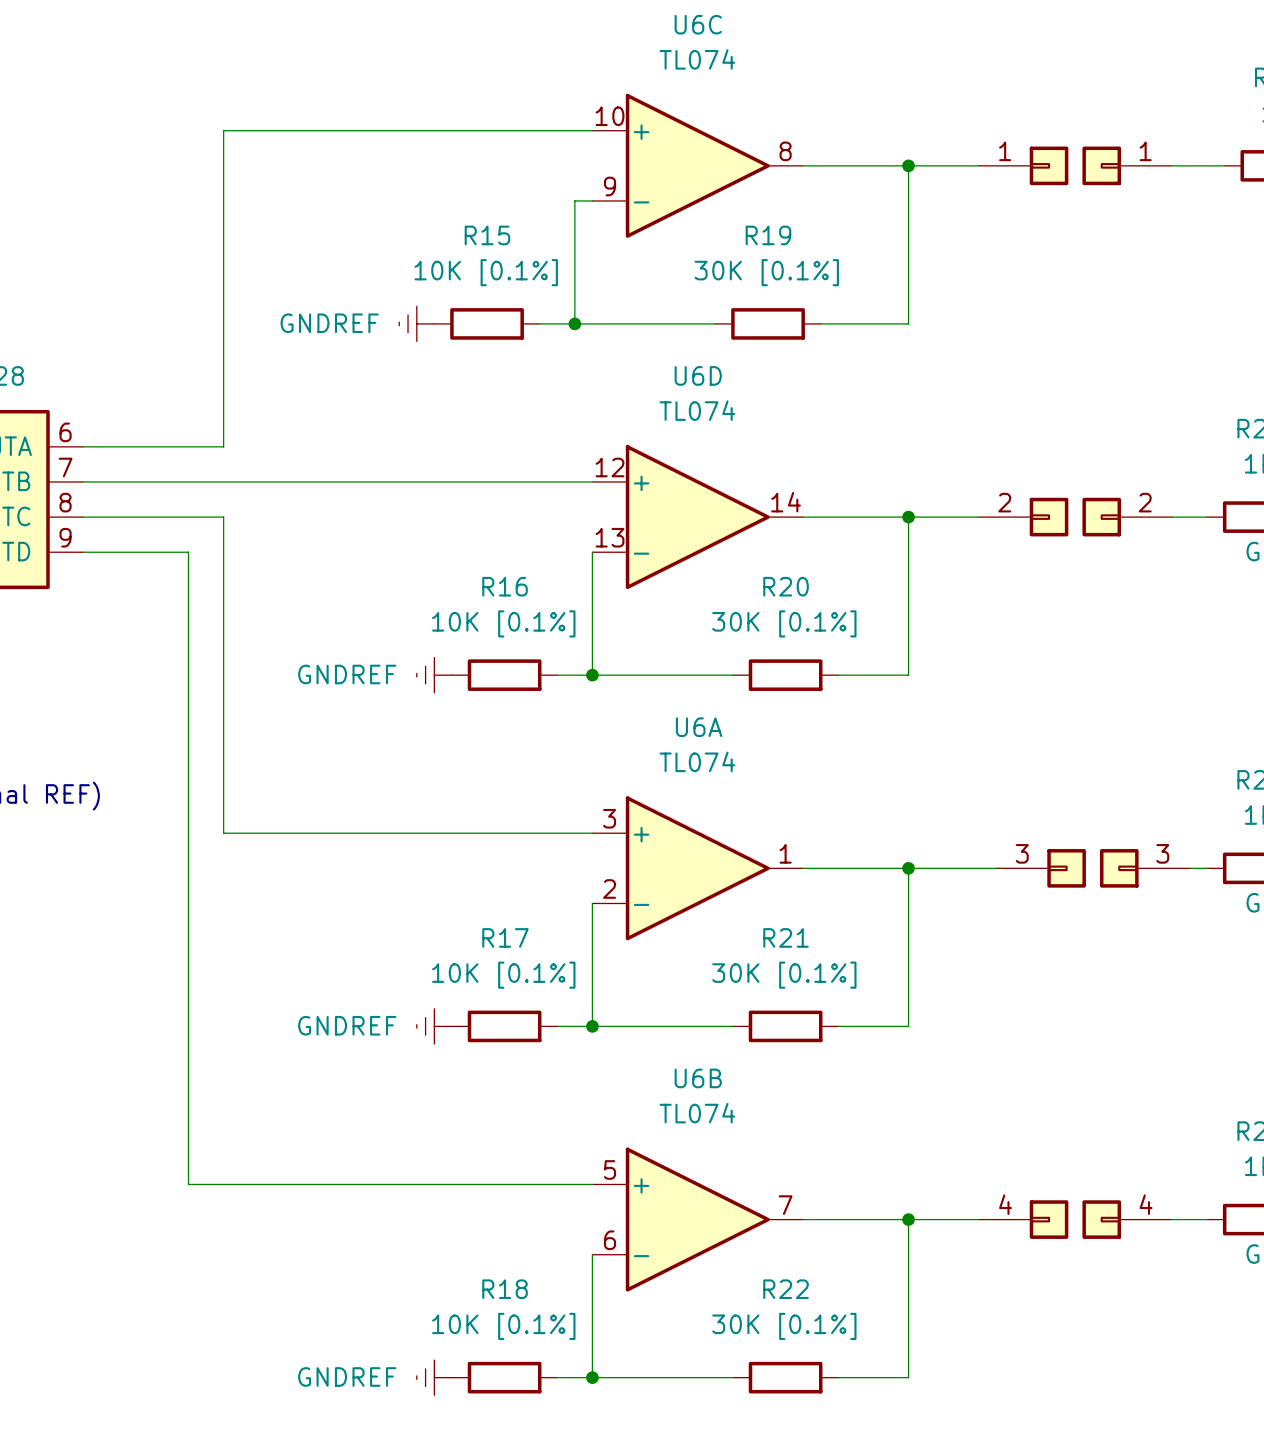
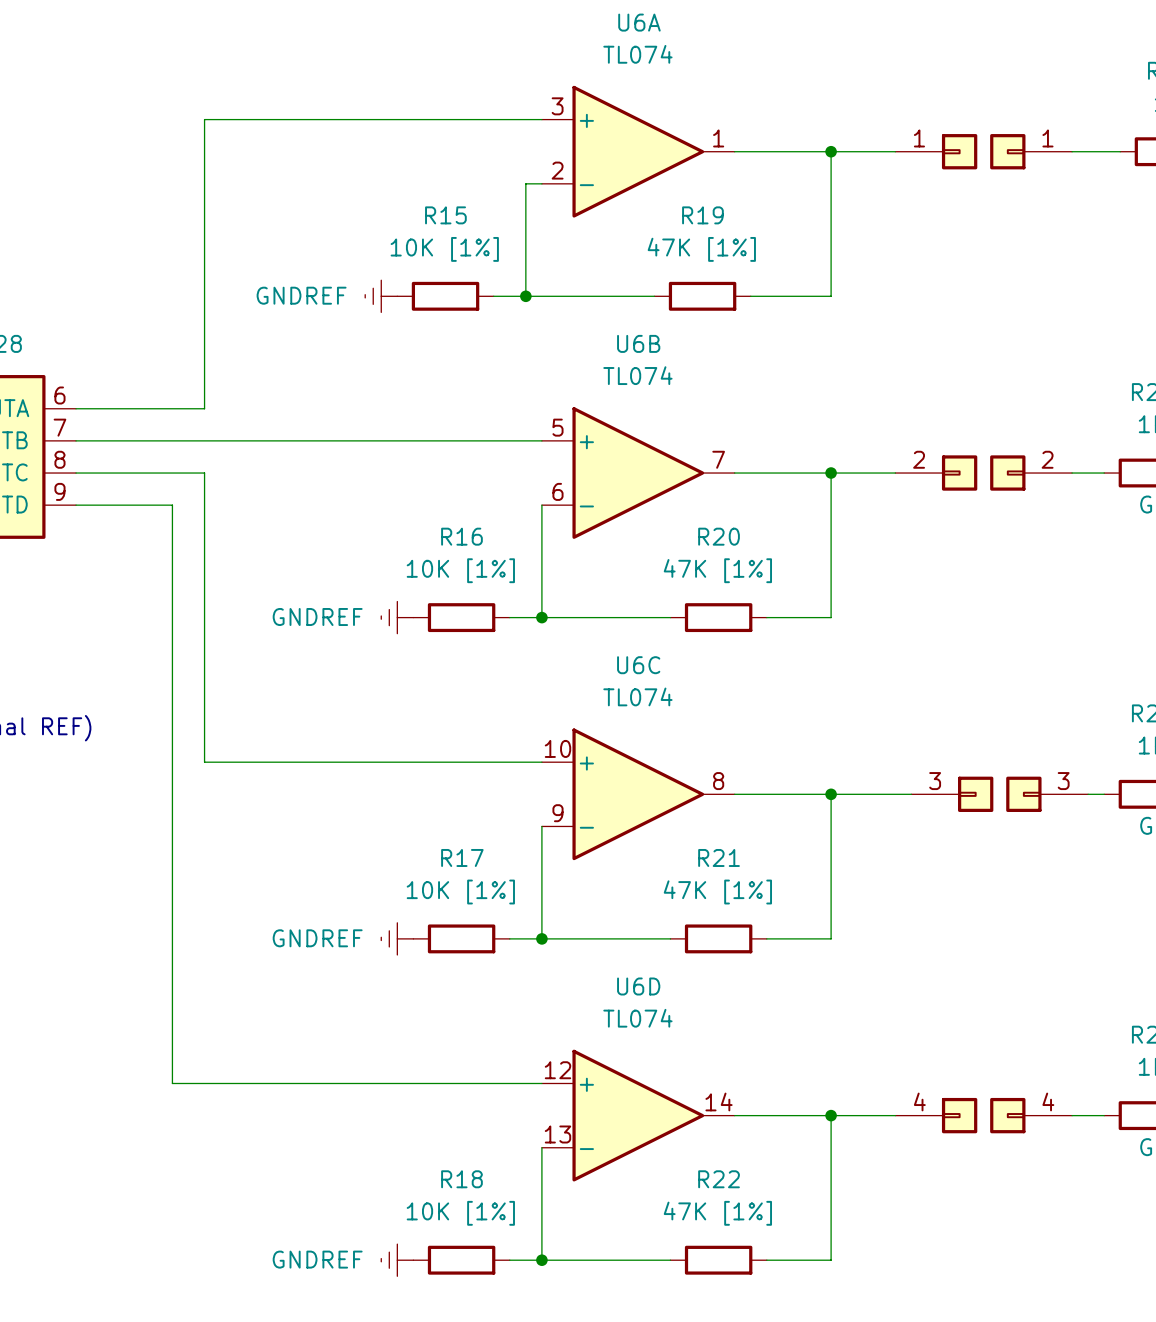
U6C position: (697, 165) -> (638, 794)
R15 value: 10K [0.1%] (486, 272) -> 10K [1%] (444, 249)
R19 value: 30K [0.1%] (766, 272) -> 47K [1%] (701, 249)
U6D position: (697, 517) -> (638, 1115)
R16 value: 10K [0.1%] (503, 623) -> 10K [1%] (460, 570)
R20 value: 30K [0.1%] (784, 623) -> 47K [1%] (717, 570)
U6A position: (697, 868) -> (638, 151)
R17 value: 10K [0.1%] (503, 975) -> 10K [1%] (460, 892)
R21 value: 30K [0.1%] (784, 975) -> 47K [1%] (717, 892)
U6B position: (697, 1219) -> (638, 473)
R18 value: 10K [0.1%] (503, 1326) -> 10K [1%] (460, 1213)
R22 value: 30K [0.1%] (784, 1326) -> 47K [1%] (717, 1213)

